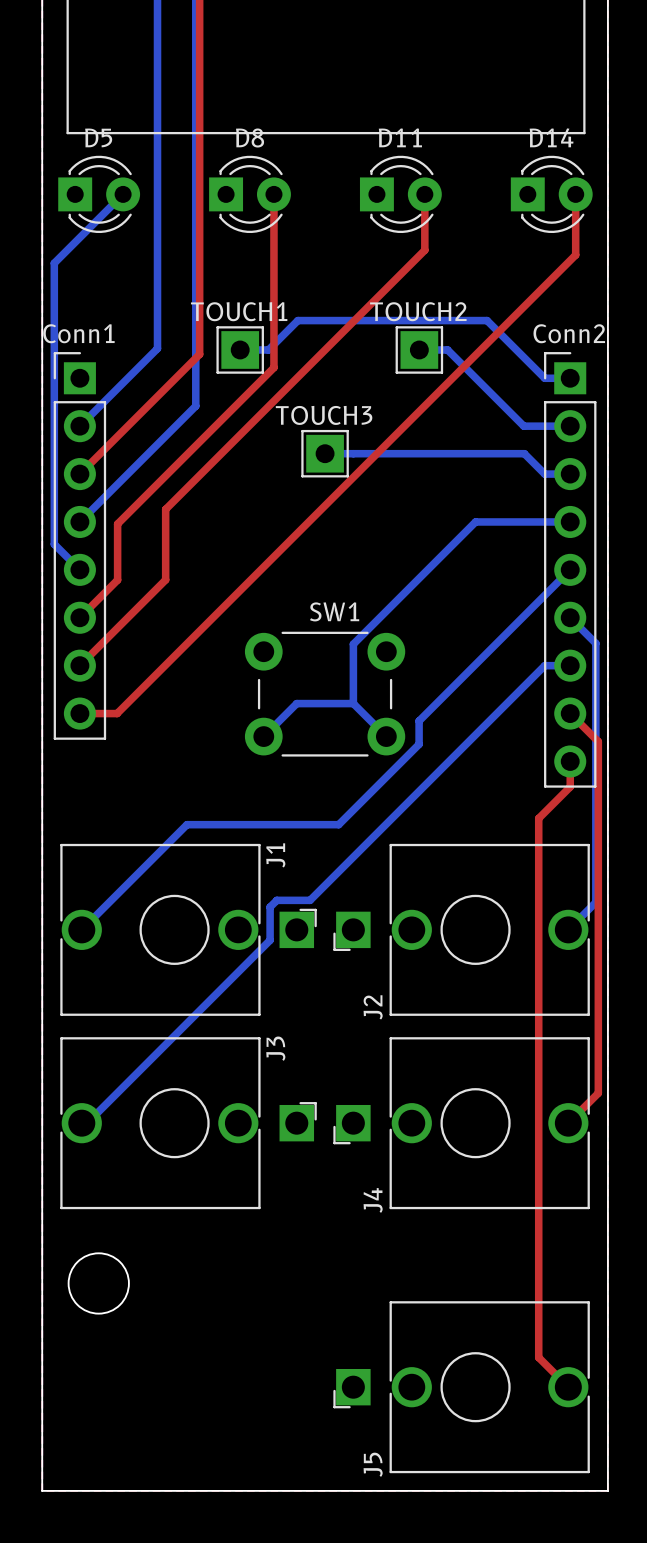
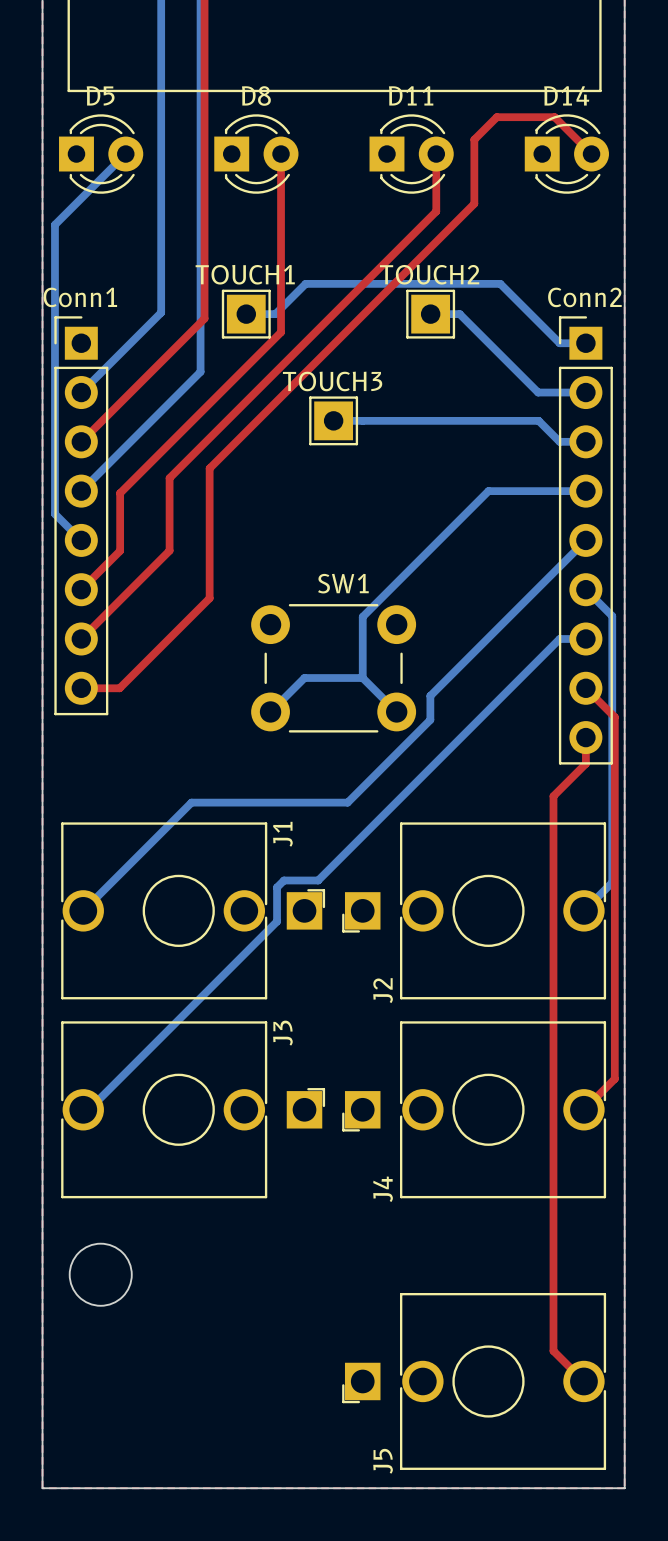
top track: (575, 194) (575, 255) (204, 626) -> (591, 154) (554, 117) (496, 117) (474, 139) (474, 203) (209, 468) (209, 598)

